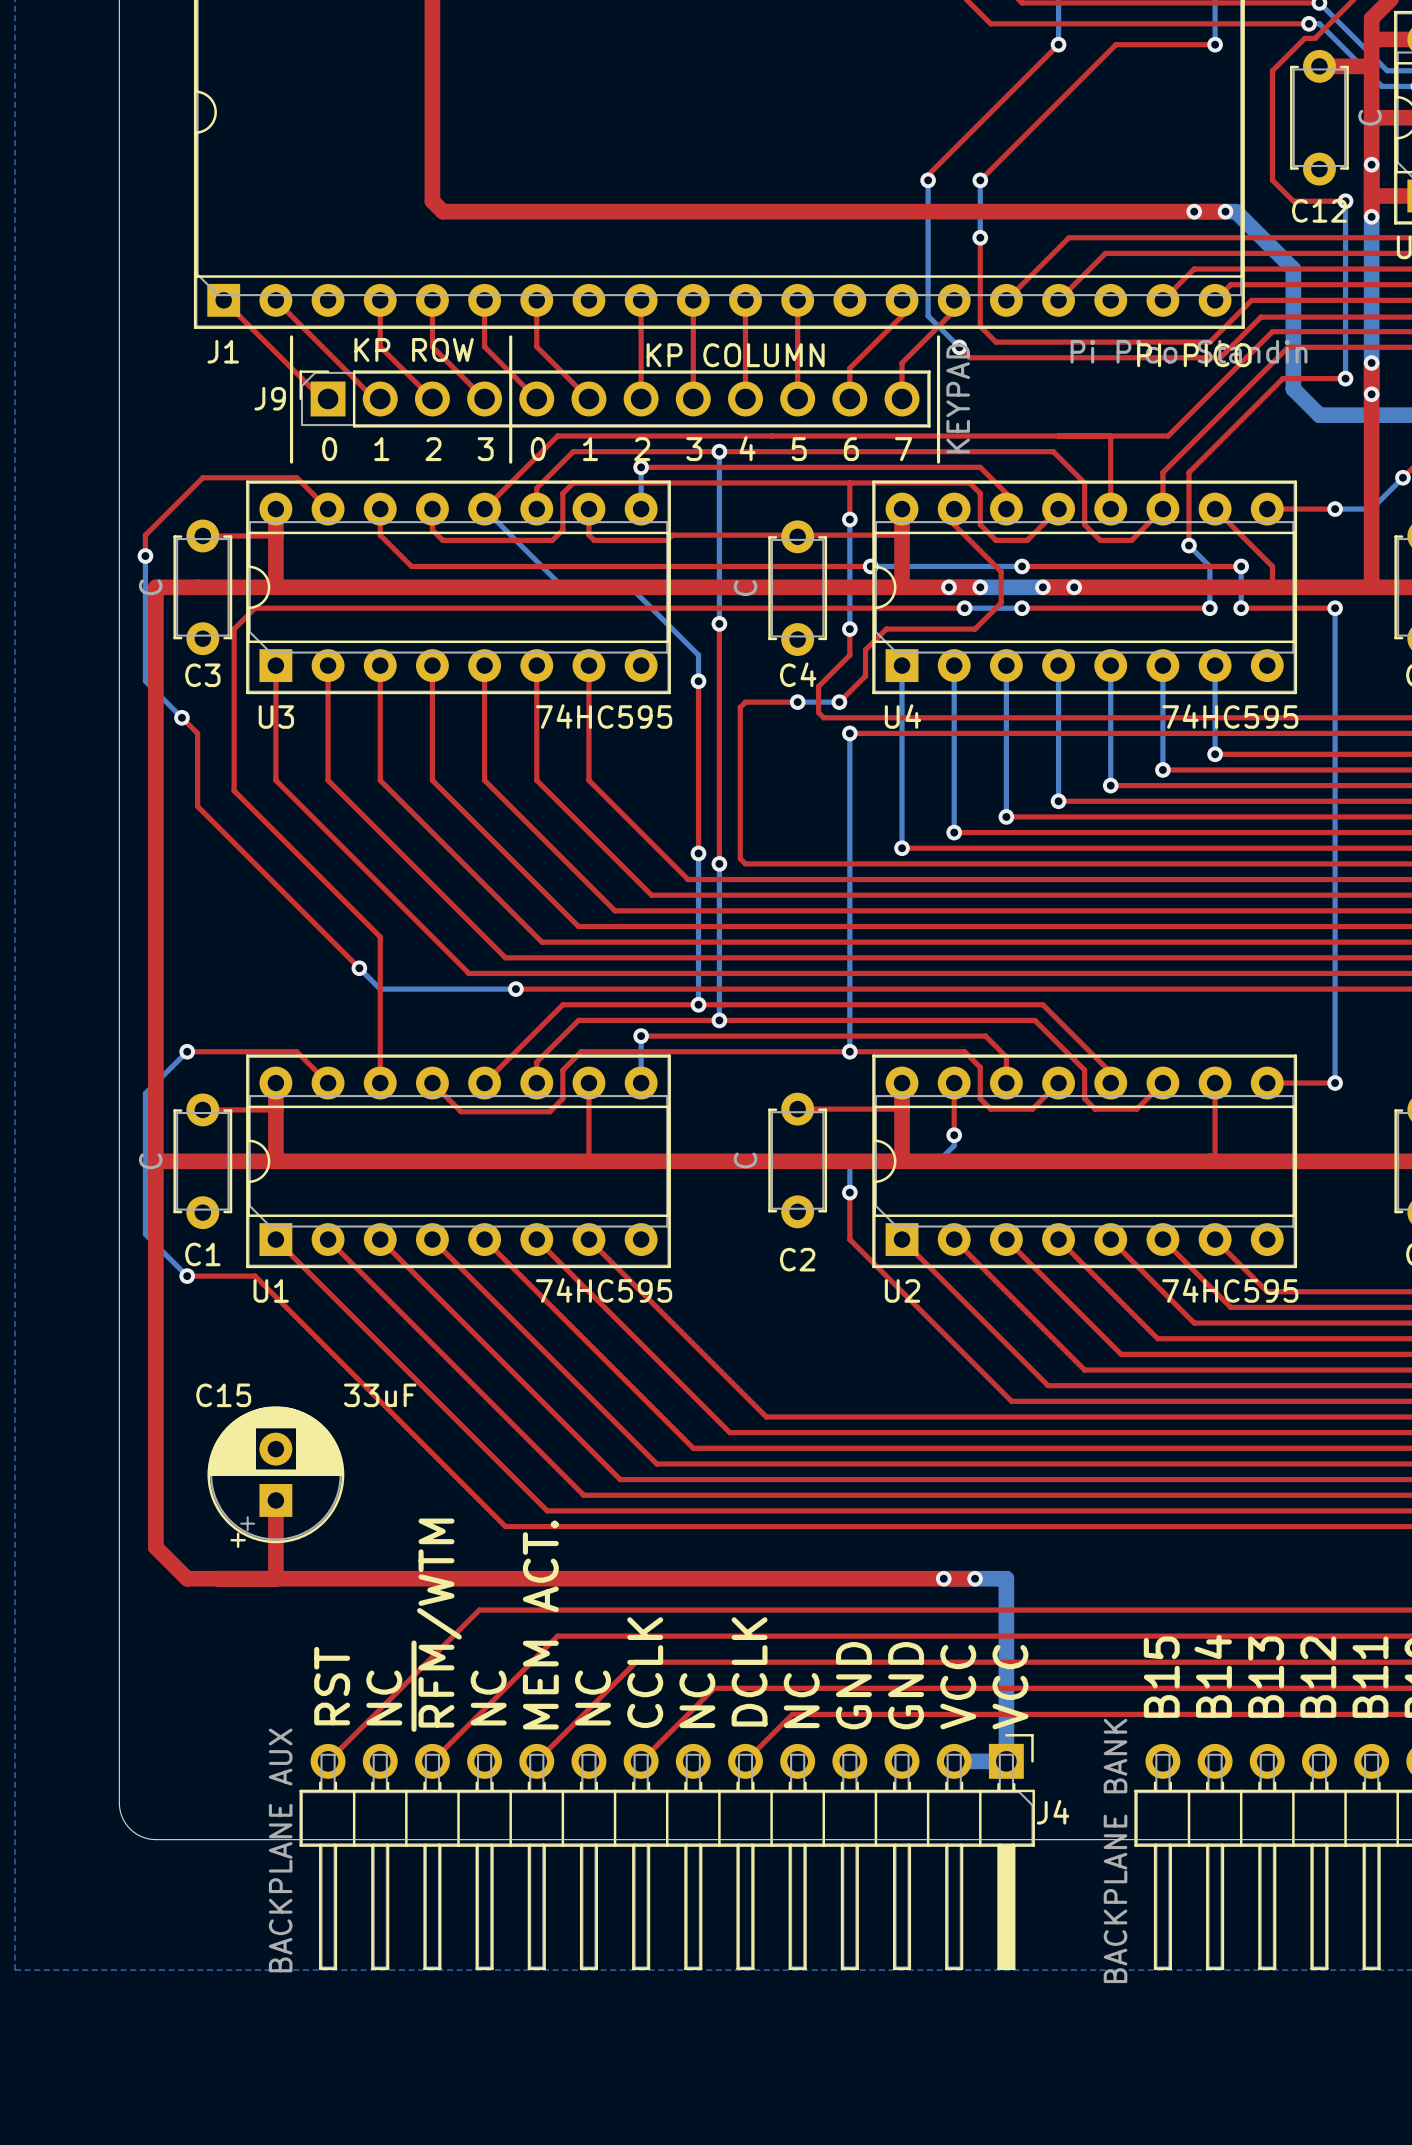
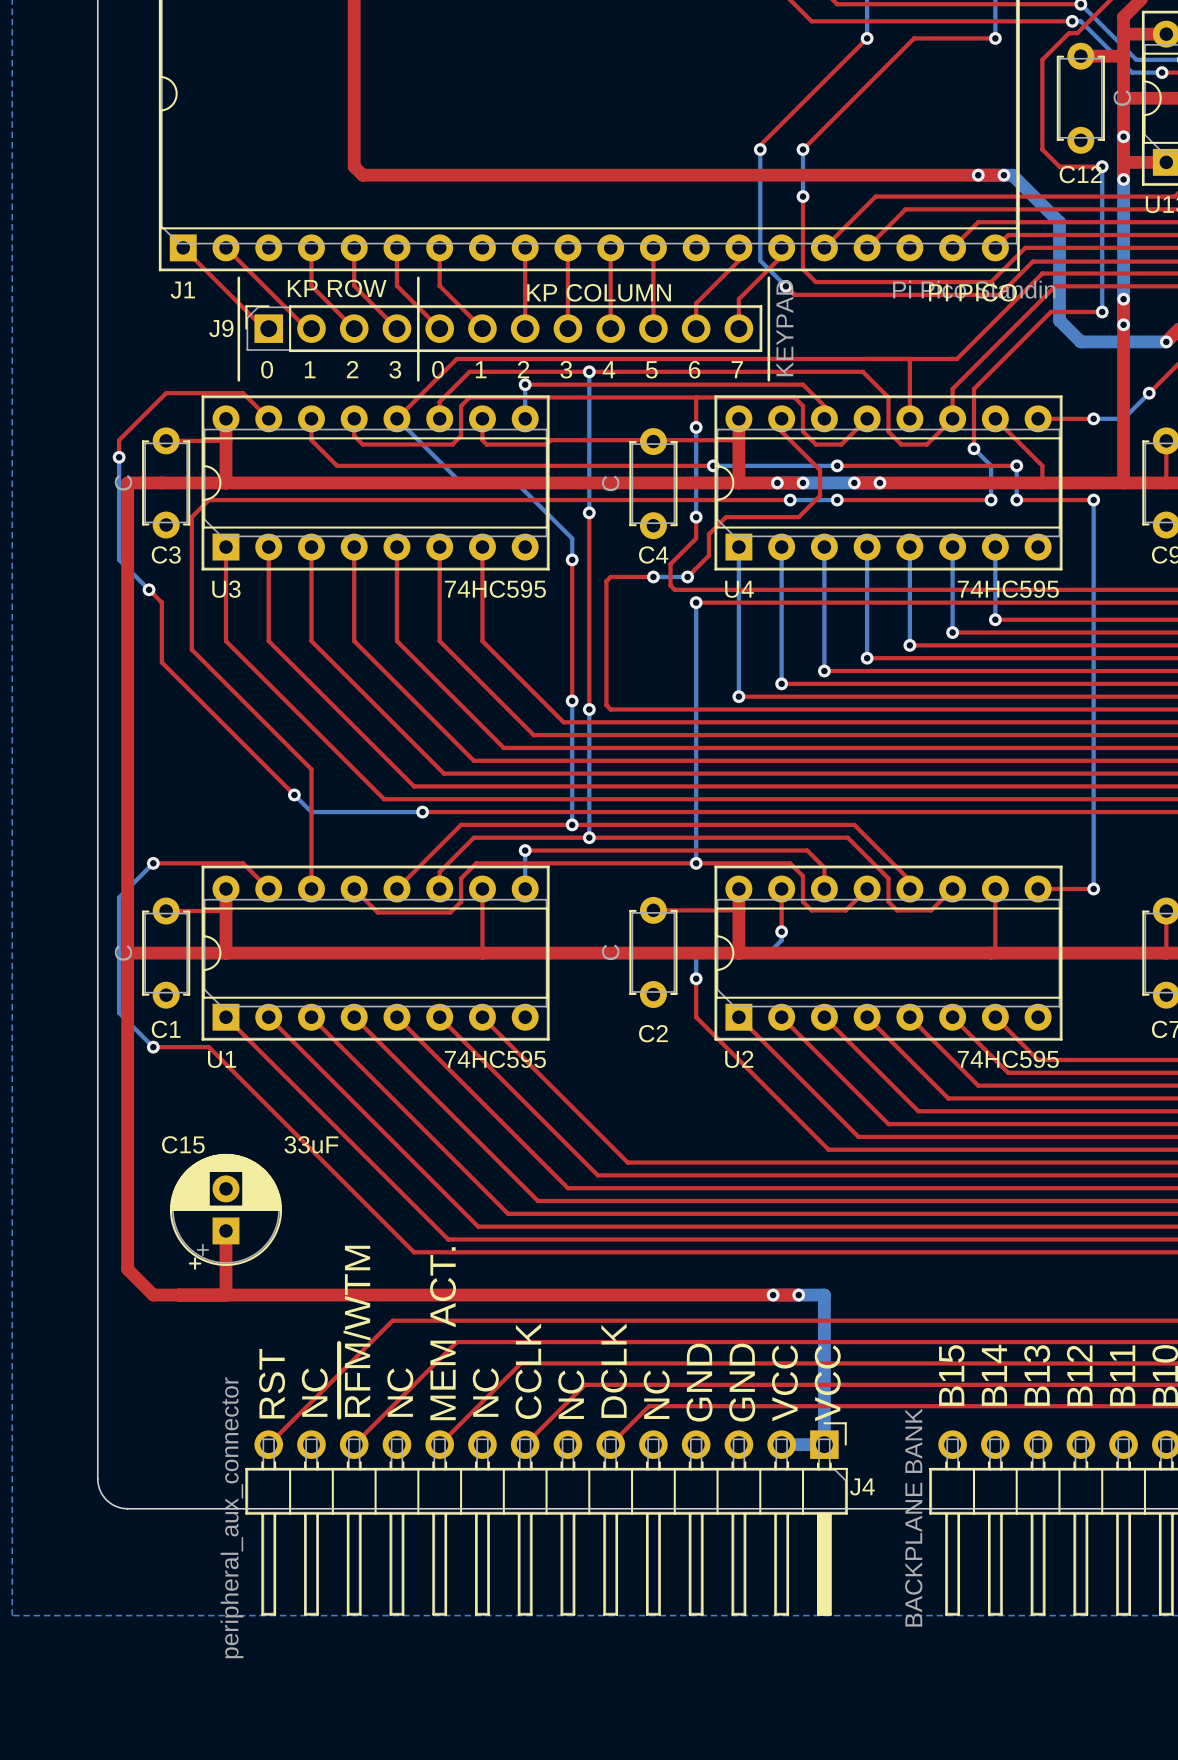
J4 value: BACKPLANE AUX (280, 1850) -> peripheral_aux_connector (232, 1517)

